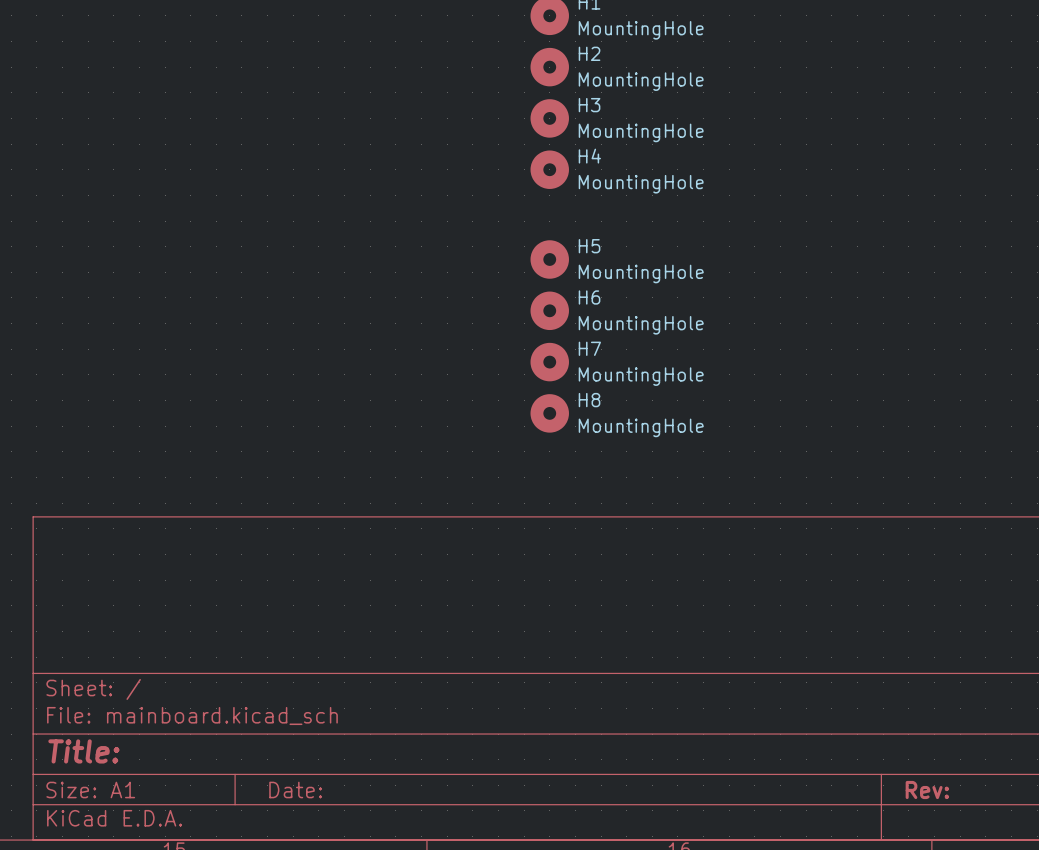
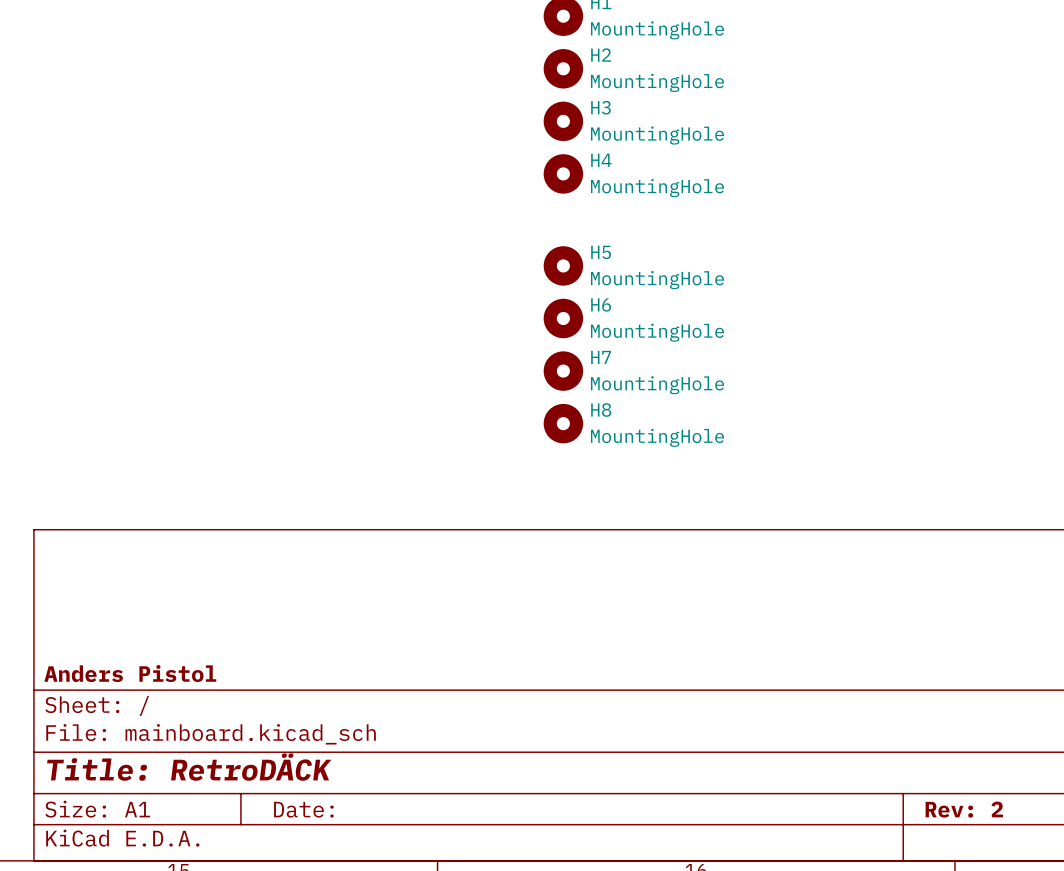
title block: none -> Anders Pistol (130, 673)
title block: Title: (83, 751) -> Title: RetroDÄCK (189, 767)
title block: Rev: (927, 789) -> Rev: 2 (964, 809)

